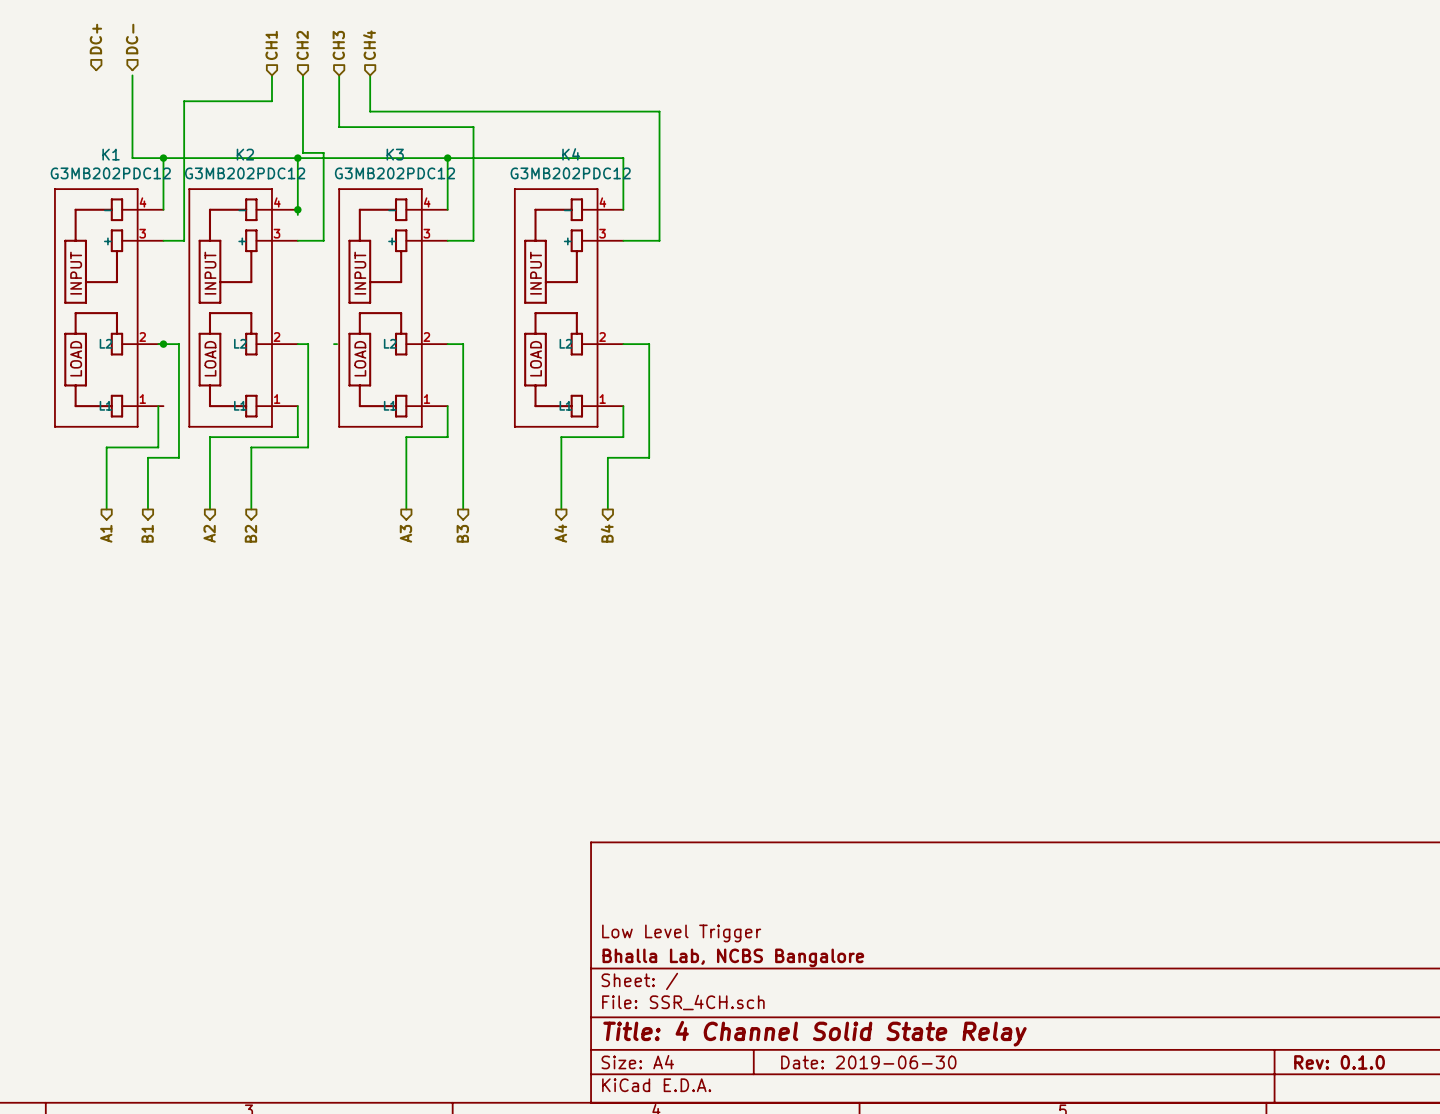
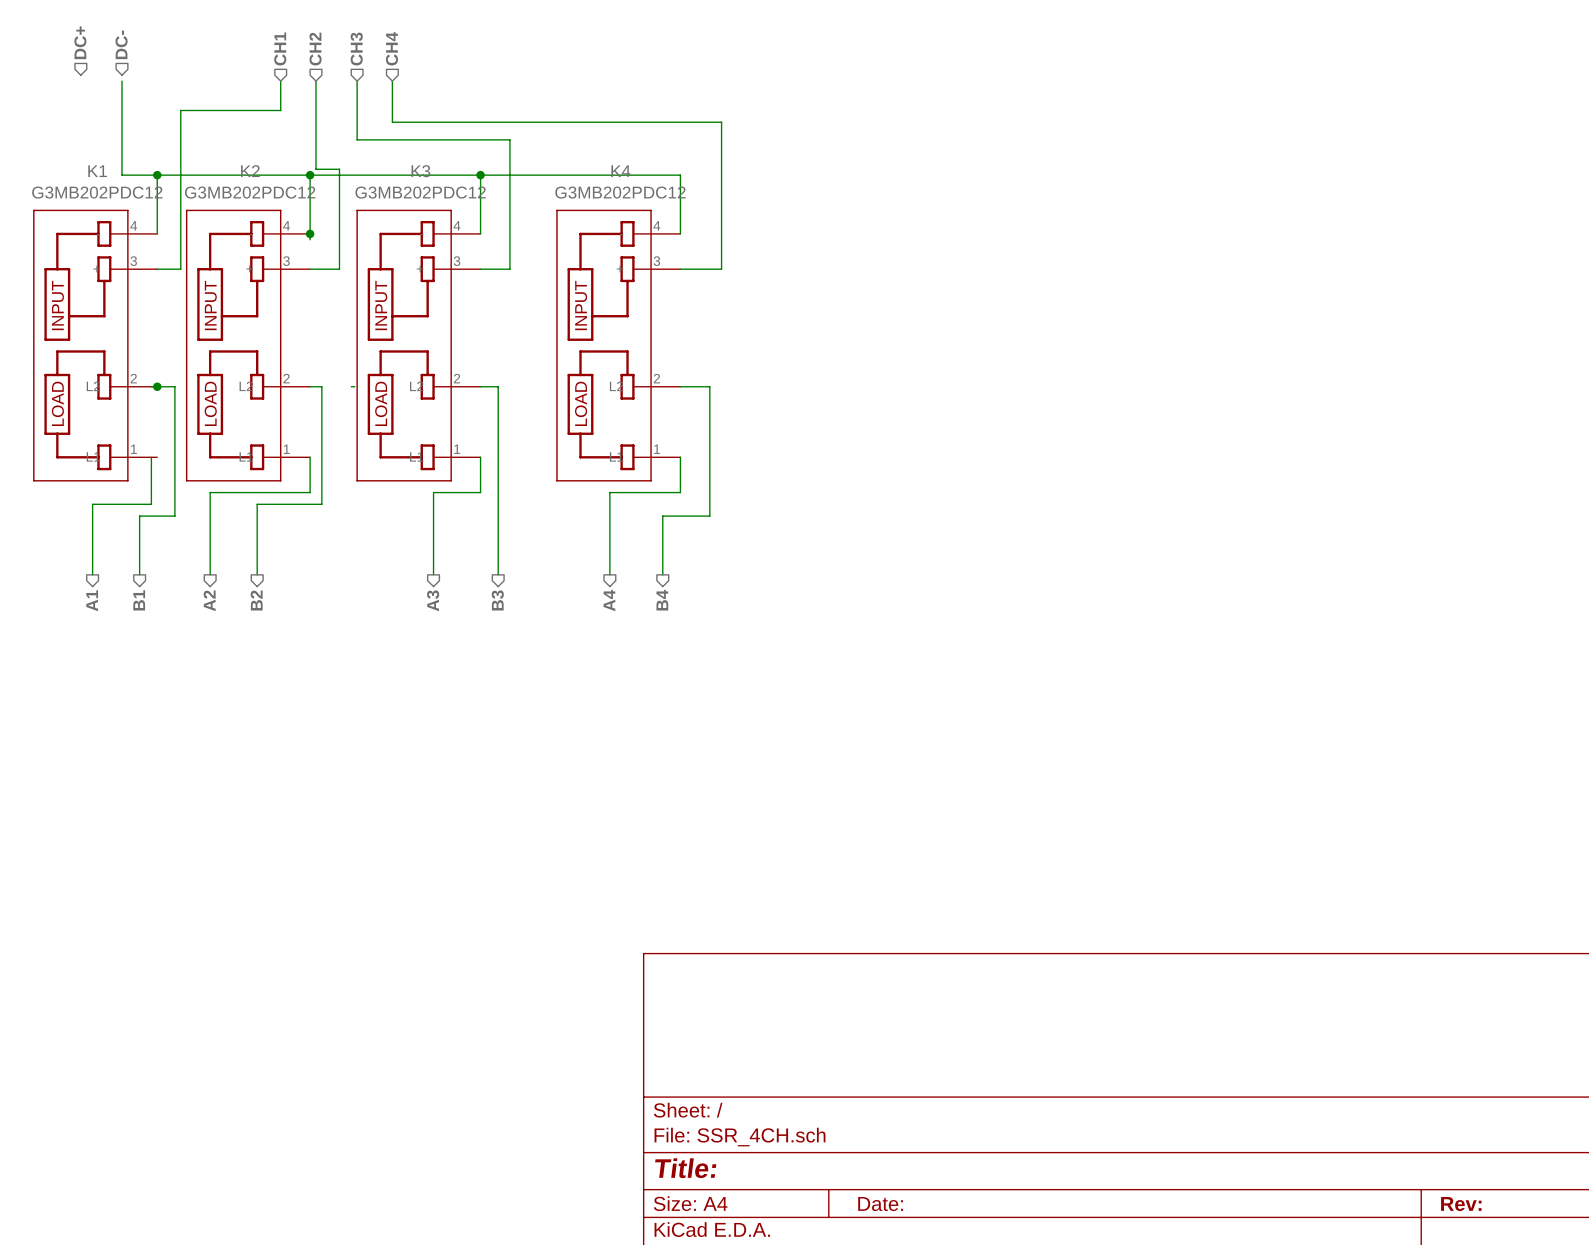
title block: Low Level Trigger (681, 933) -> none
title block: Bhalla Lab, NCBS Bangalore (733, 957) -> none
title block: Title: 4 Channel Solid State Relay (814, 1033) -> Title: (685, 1168)
title block: Date: 2019-06-30 (868, 1062) -> Date: (880, 1204)
title block: Rev: 0.1.0 (1339, 1062) -> Rev: (1461, 1204)

